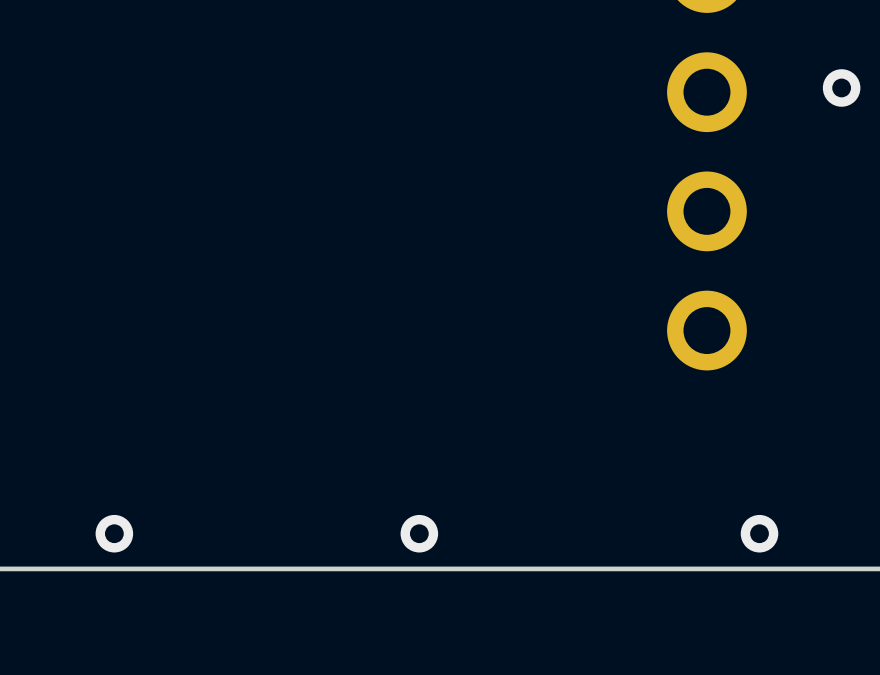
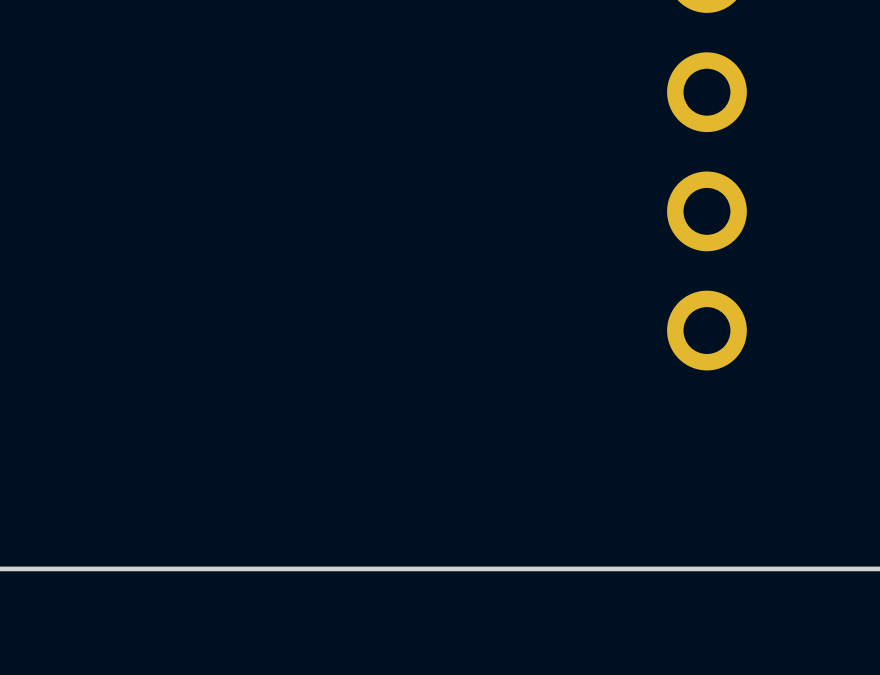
via: (841, 87) -> none
via: (114, 533) -> none
via: (419, 533) -> none
via: (759, 533) -> none

